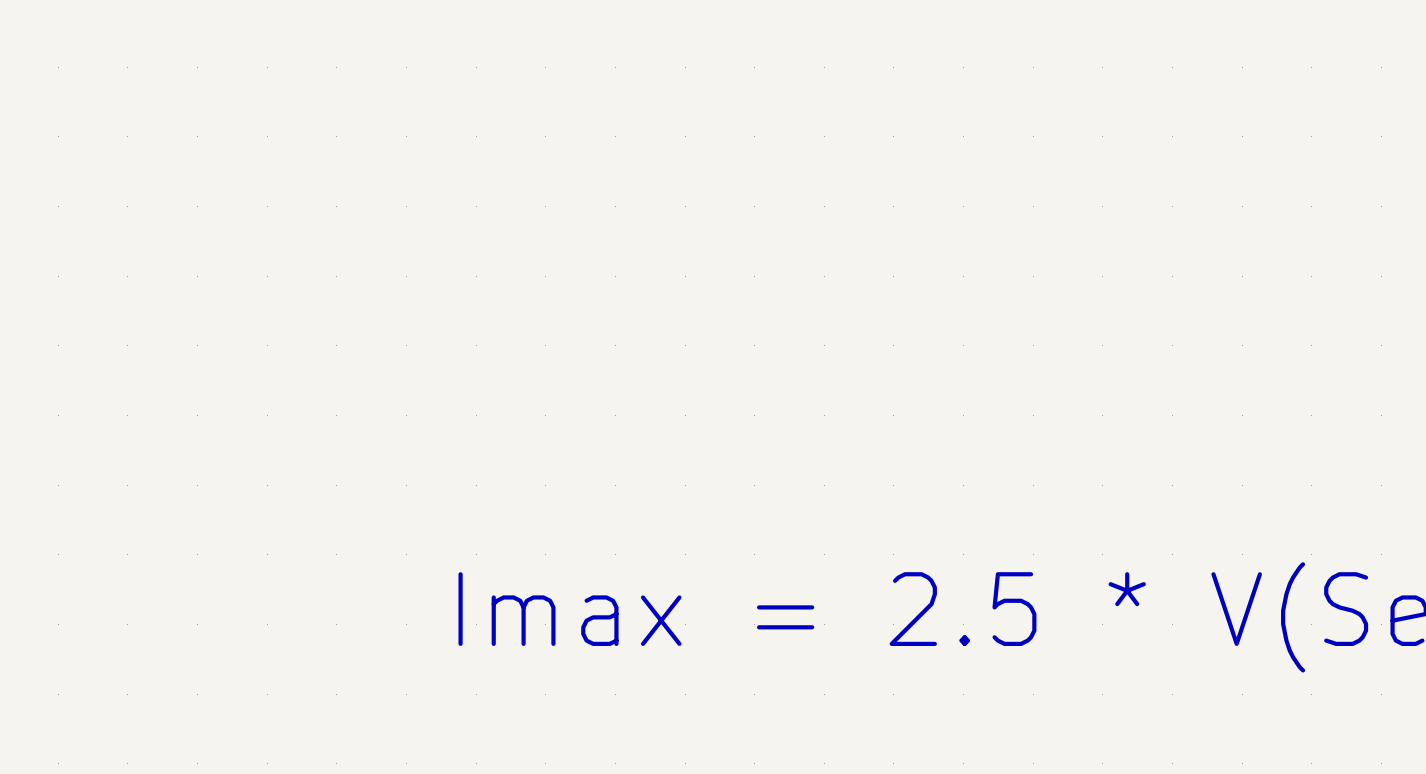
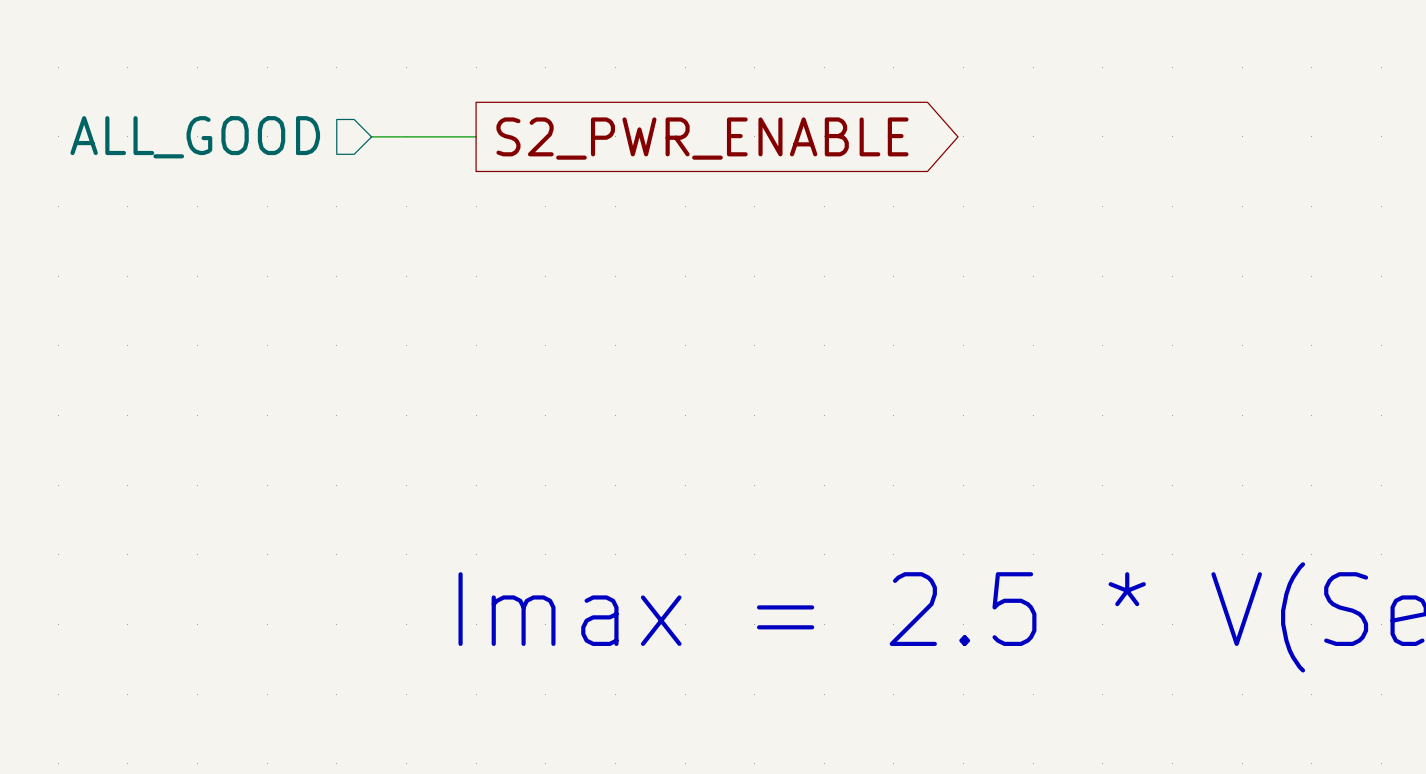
wire: none -> (371, 136) (476, 136)
sheet pin: none -> ALL_GOOD (195, 137)
global label: none -> S2_PWR_ENABLE (702, 138)

